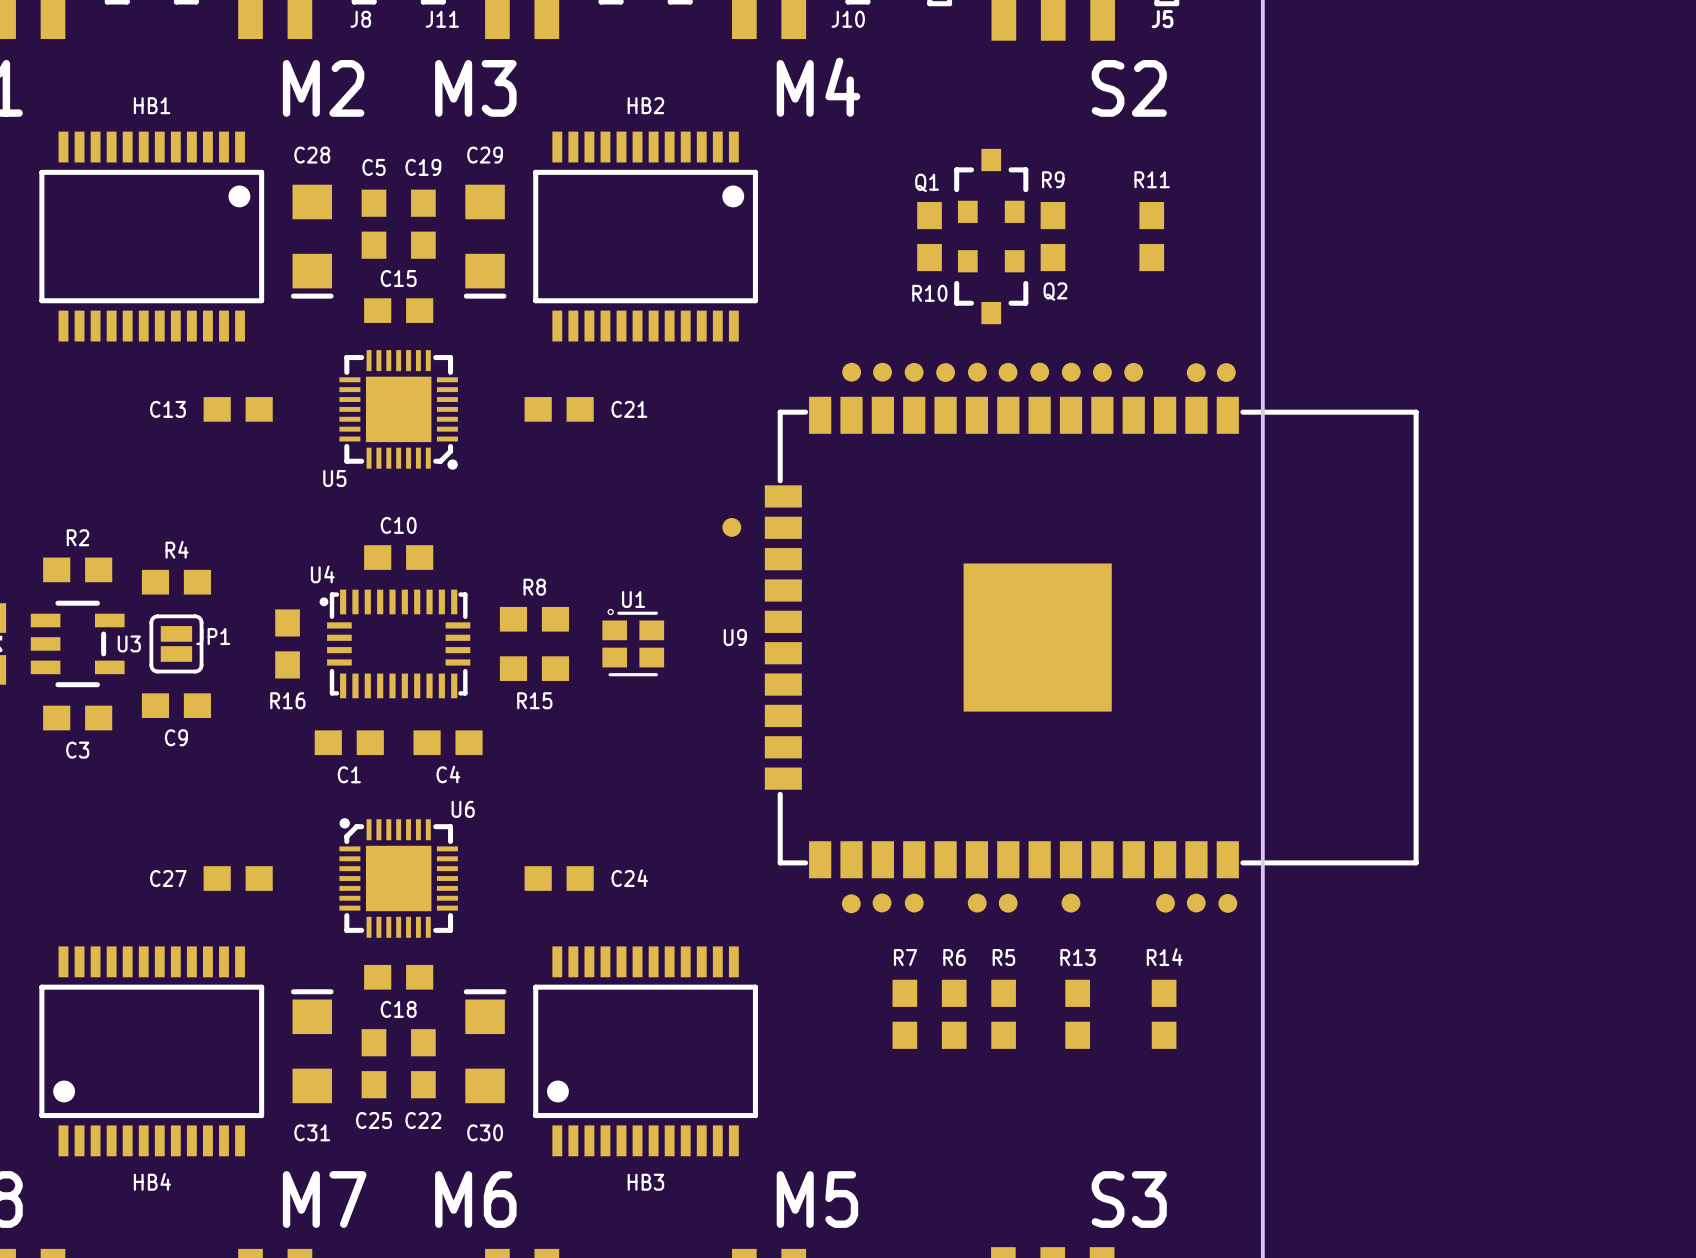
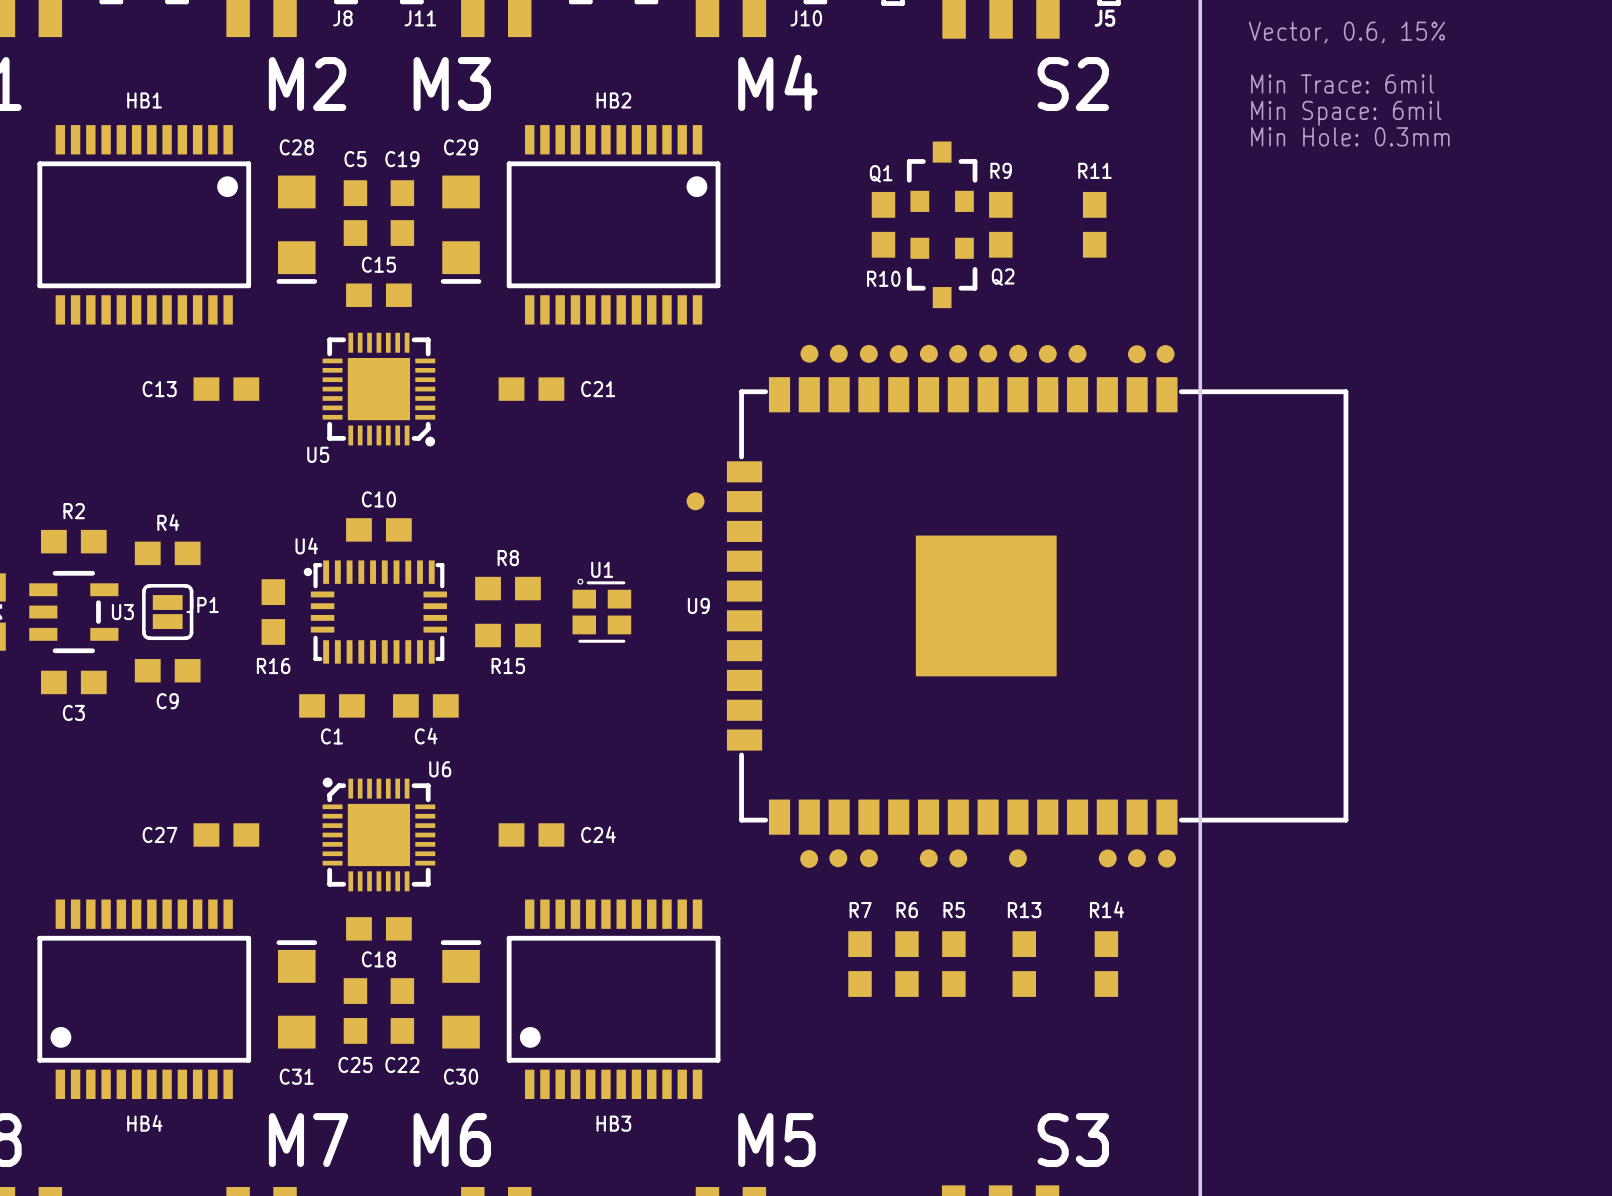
text: none -> Vector, 0.6, 15% (1346, 32)
text: none -> Min Trace: 6mil (1342, 84)
text: none -> Min Space: 6mil (1346, 113)
text: none -> Min Hole: 0.3mm (1350, 136)

